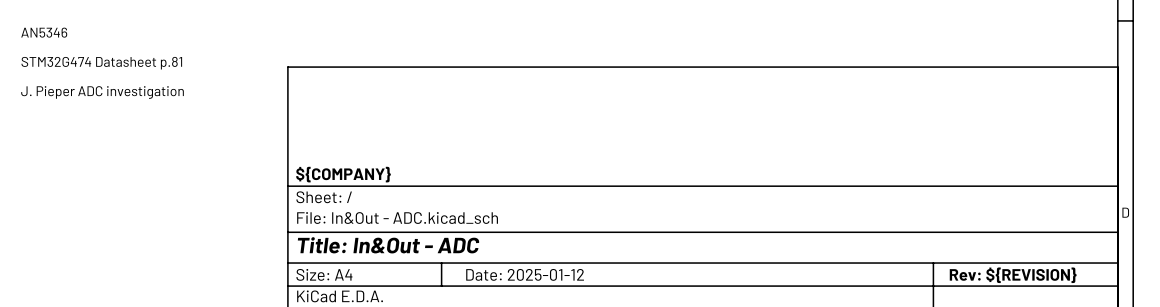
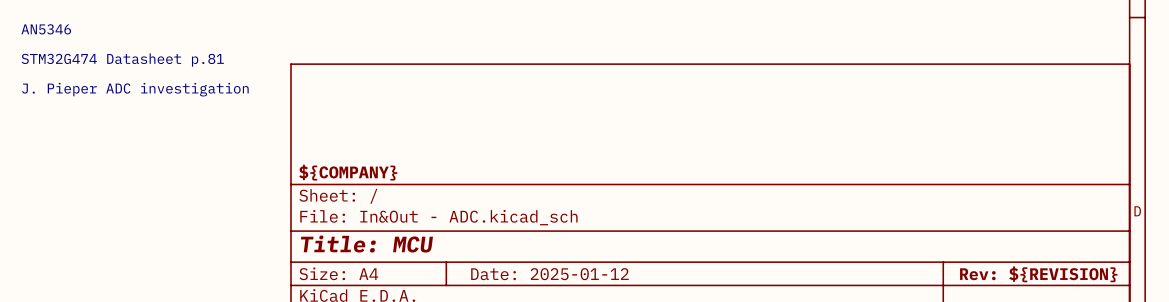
title block: Title: In&Out - ADC (388, 245) -> Title: MCU (366, 244)

